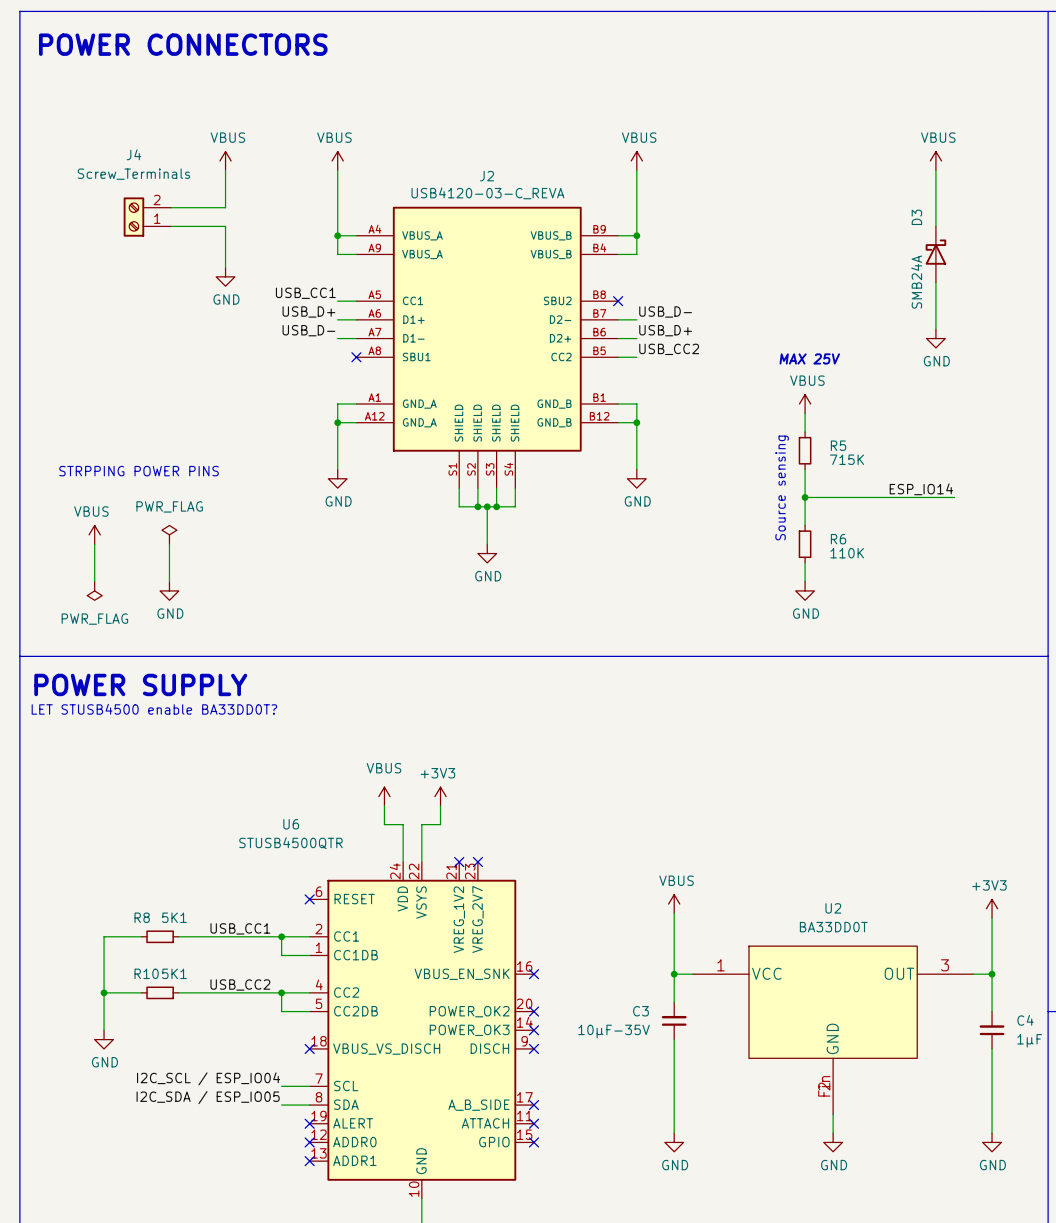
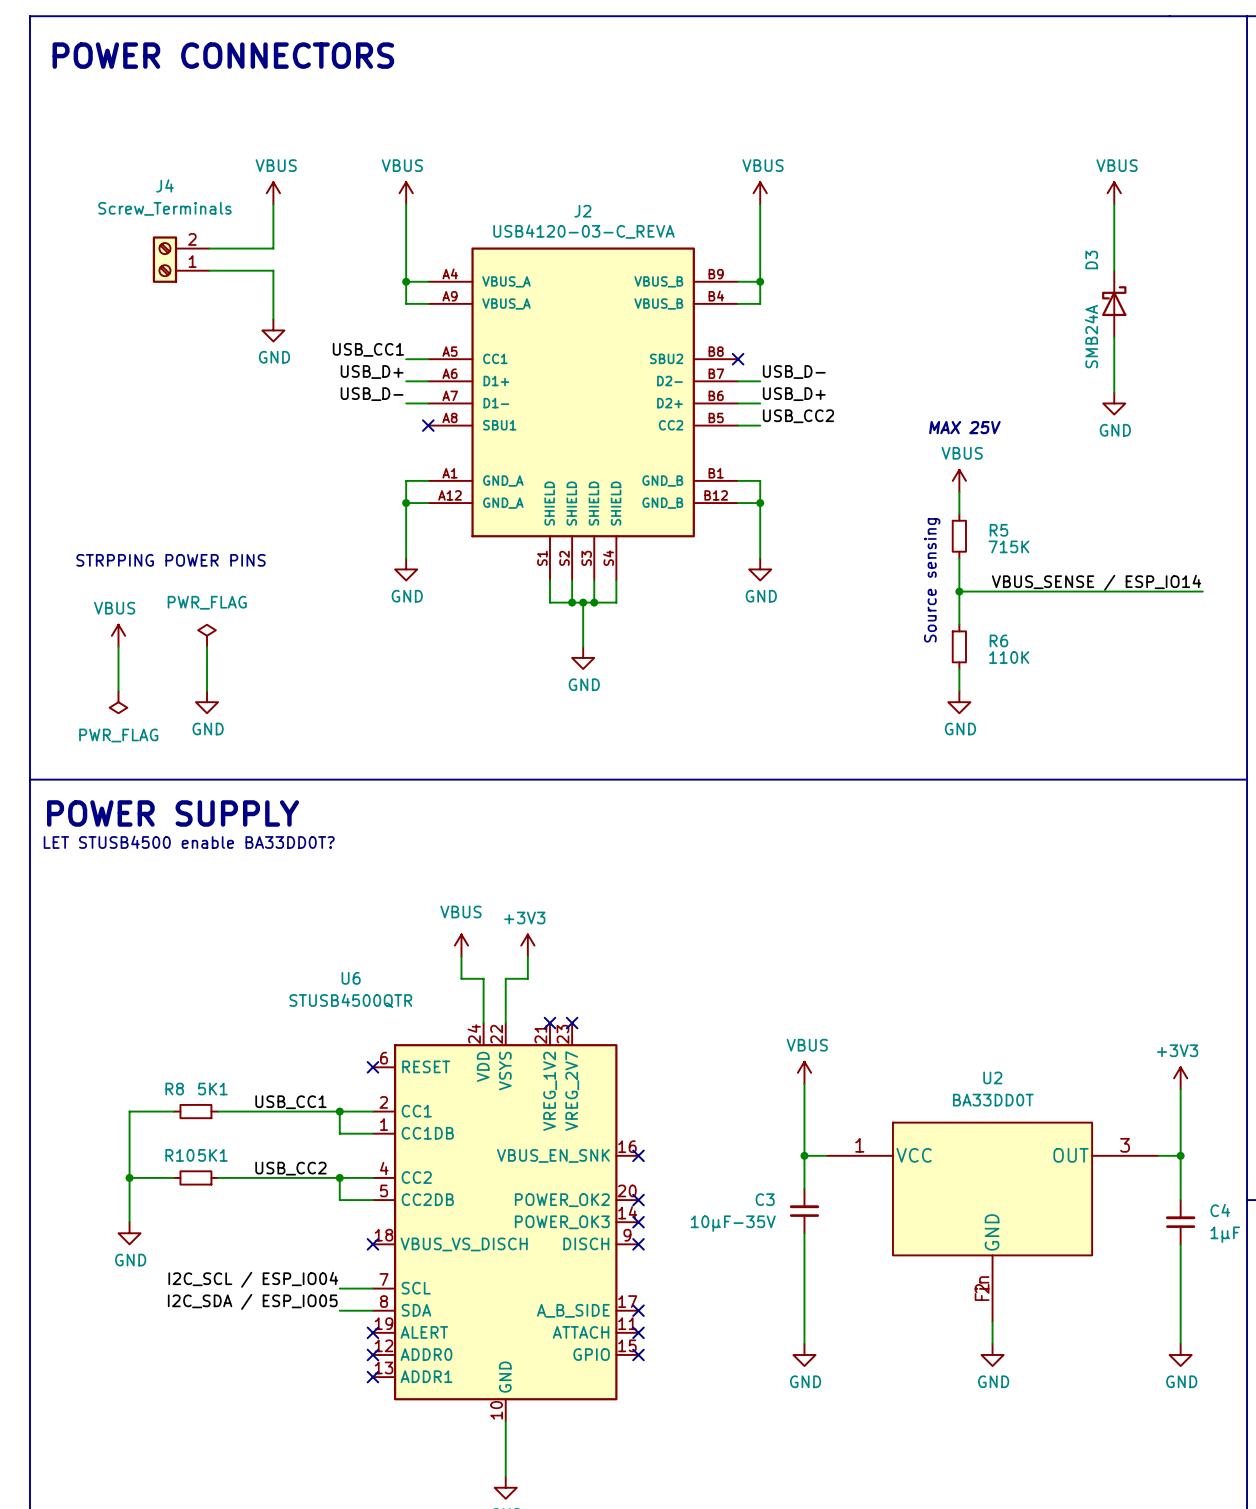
label: ESP_IO14 (921, 489) -> none
label: none -> VBUS_SENSE / ESP_IO14 (1096, 582)
wire: none -> (1136, 591) (1202, 591)

